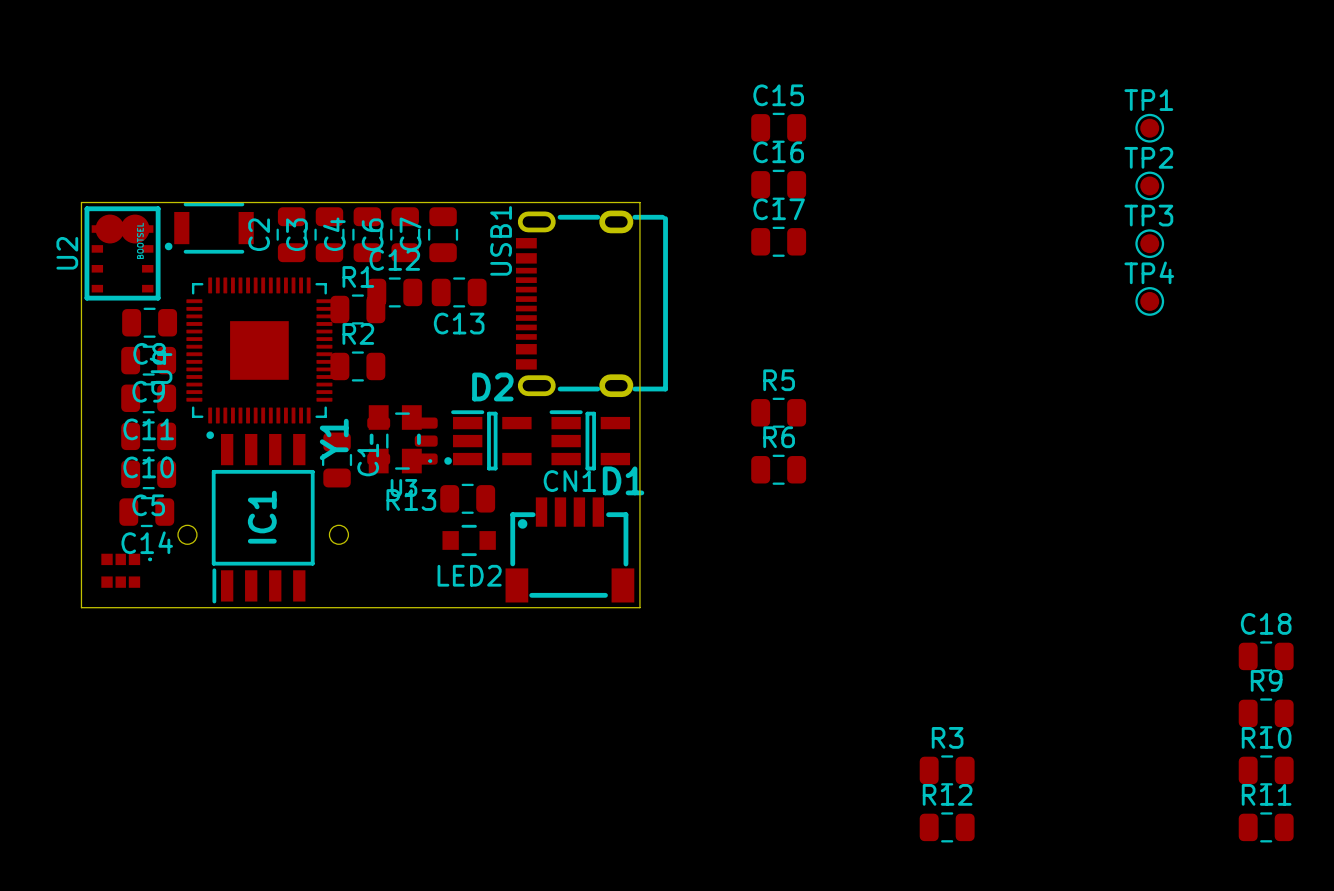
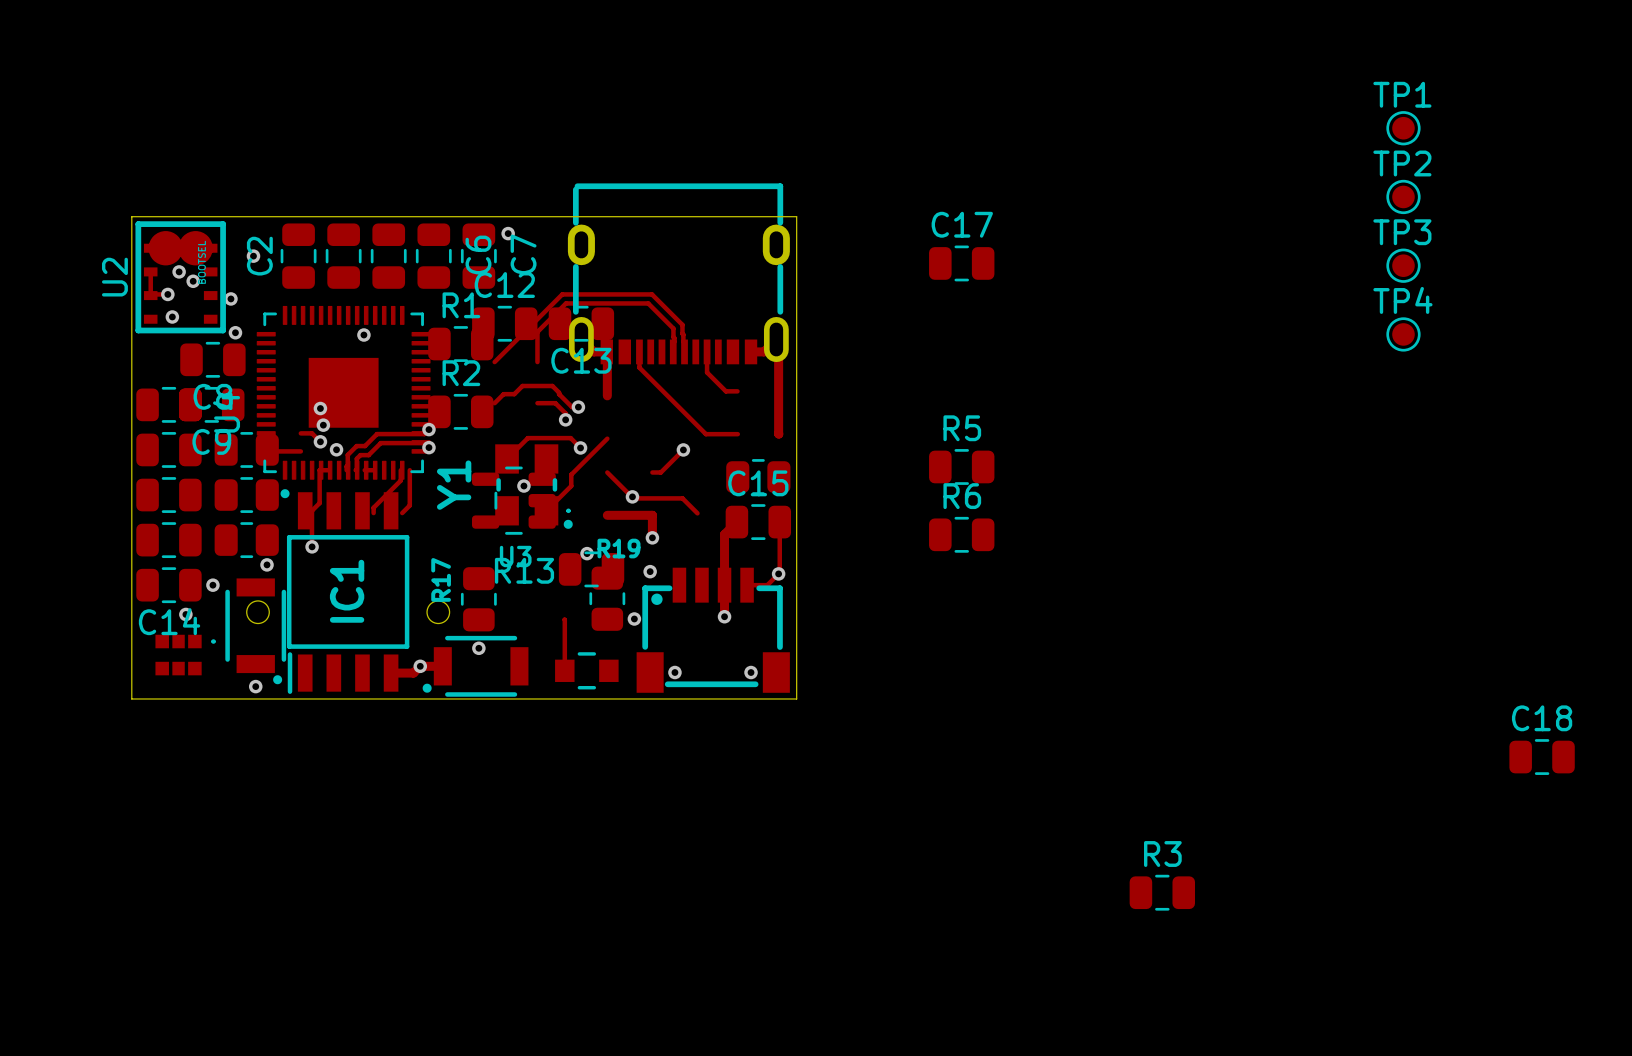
C15 position: (778, 127) -> (758, 522)
C16: (778, 184) -> none
via: none -> (508, 233)
part: (209, 228) -> none
C2 position: (291, 234) -> (298, 256)
C3: (329, 234) -> none
C4: (367, 234) -> none
C6 position: (405, 234) -> (433, 256)
C7 position: (443, 234) -> (478, 256)
via: none -> (253, 256)
part: none -> (343, 256)
part: none -> (388, 256)
track: none -> (150, 270) (150, 294) (167, 294)
via: none -> (179, 271)
part: none -> (678, 273)
via: none -> (193, 281)
via: none -> (167, 294)
via: none -> (230, 298)
via: none -> (172, 316)
via: none -> (235, 332)
via: none -> (363, 335)
USB1: (591, 303) -> none
track: none -> (581, 339) (593, 351) (607, 352) (607, 395)
track: none -> (639, 351) (639, 367) (705, 434) (737, 434)
track: none -> (673, 351) (673, 328) (648, 303) (565, 303) (537, 331) (537, 362)
track: none -> (684, 351) (682, 324) (652, 294) (562, 294) (494, 362)
track: none -> (707, 351) (707, 372) (725, 391) (737, 391)
track: none -> (751, 351) (763, 351) (776, 339) (778, 341) (778, 433)
track: none -> (494, 403) (503, 394) (514, 394) (522, 386) (552, 386) (572, 407) (578, 407)
track: none -> (537, 403) (555, 403) (565, 413) (565, 419)
part: none -> (168, 404)
via: none -> (578, 407)
via: none -> (320, 408)
via: none -> (565, 419)
via: none -> (323, 425)
track: none -> (428, 429) (424, 434) (377, 434) (365, 446) (356, 446) (347, 455) (346, 470)
via: none -> (428, 429)
track: none -> (300, 433) (312, 433) (320, 441)
track: none -> (607, 438) (571, 474) (571, 486) (546, 510)
via: none -> (320, 441)
track: none -> (428, 447) (424, 443) (380, 443) (368, 455) (360, 455) (356, 458) (355, 470)
via: none -> (428, 447)
track: none -> (580, 447) (570, 438) (527, 438) (507, 458)
via: none -> (580, 447)
part: none -> (168, 449)
C11: (148, 398) -> none
part: none -> (246, 449)
track: none -> (267, 449) (300, 451)
via: none -> (336, 449)
track: none -> (683, 449) (660, 472) (652, 472)
via: none -> (683, 449)
track: none -> (328, 470) (319, 470) (319, 503) (311, 510) (311, 546)
track: none -> (364, 470) (373, 470)
track: none -> (400, 470) (400, 480) (373, 507) (373, 513)
track: none -> (409, 470) (409, 505) (402, 513)
track: none -> (607, 472) (633, 498) (682, 498) (697, 513)
part: none -> (758, 477)
via: none -> (523, 486)
part: none -> (168, 495)
C10: (148, 436) -> none
part: none -> (246, 495)
via: none -> (632, 496)
Y1 position: (400, 439) -> (532, 484)
D2: (491, 440) -> none
D1: (589, 440) -> none
track: none -> (607, 515) (652, 515) (652, 537)
track: none -> (736, 522) (724, 534) (724, 616)
track: none -> (779, 522) (779, 572) (767, 585) (747, 585)
C1: (337, 460) -> none
via: none -> (652, 537)
part: none -> (168, 540)
C5: (148, 474) -> none
part: none -> (246, 540)
via: none -> (312, 546)
CN1 name: CN1 (569, 481) -> none
via: none -> (587, 553)
via: none -> (267, 564)
via: none -> (650, 571)
via: none -> (778, 573)
C14 position: (146, 512) -> (168, 585)
via: none -> (212, 585)
R17: none -> (478, 599)
R19: none -> (607, 598)
via: none -> (185, 614)
via: none -> (724, 616)
LED2: (469, 540) -> none
via: none -> (634, 618)
track: none -> (564, 619) (564, 670)
part: none -> (255, 631)
via: none -> (478, 648)
via: none -> (420, 666)
track: none -> (442, 666) (420, 666) (413, 673) (397, 673)
part: none -> (475, 666)
part: none -> (586, 670)
via: none -> (674, 672)
via: none -> (751, 672)
via: none -> (255, 686)
R9: (1266, 713) -> none
R10: (1266, 770) -> none
R12: (947, 827) -> none
R11: (1266, 827) -> none

